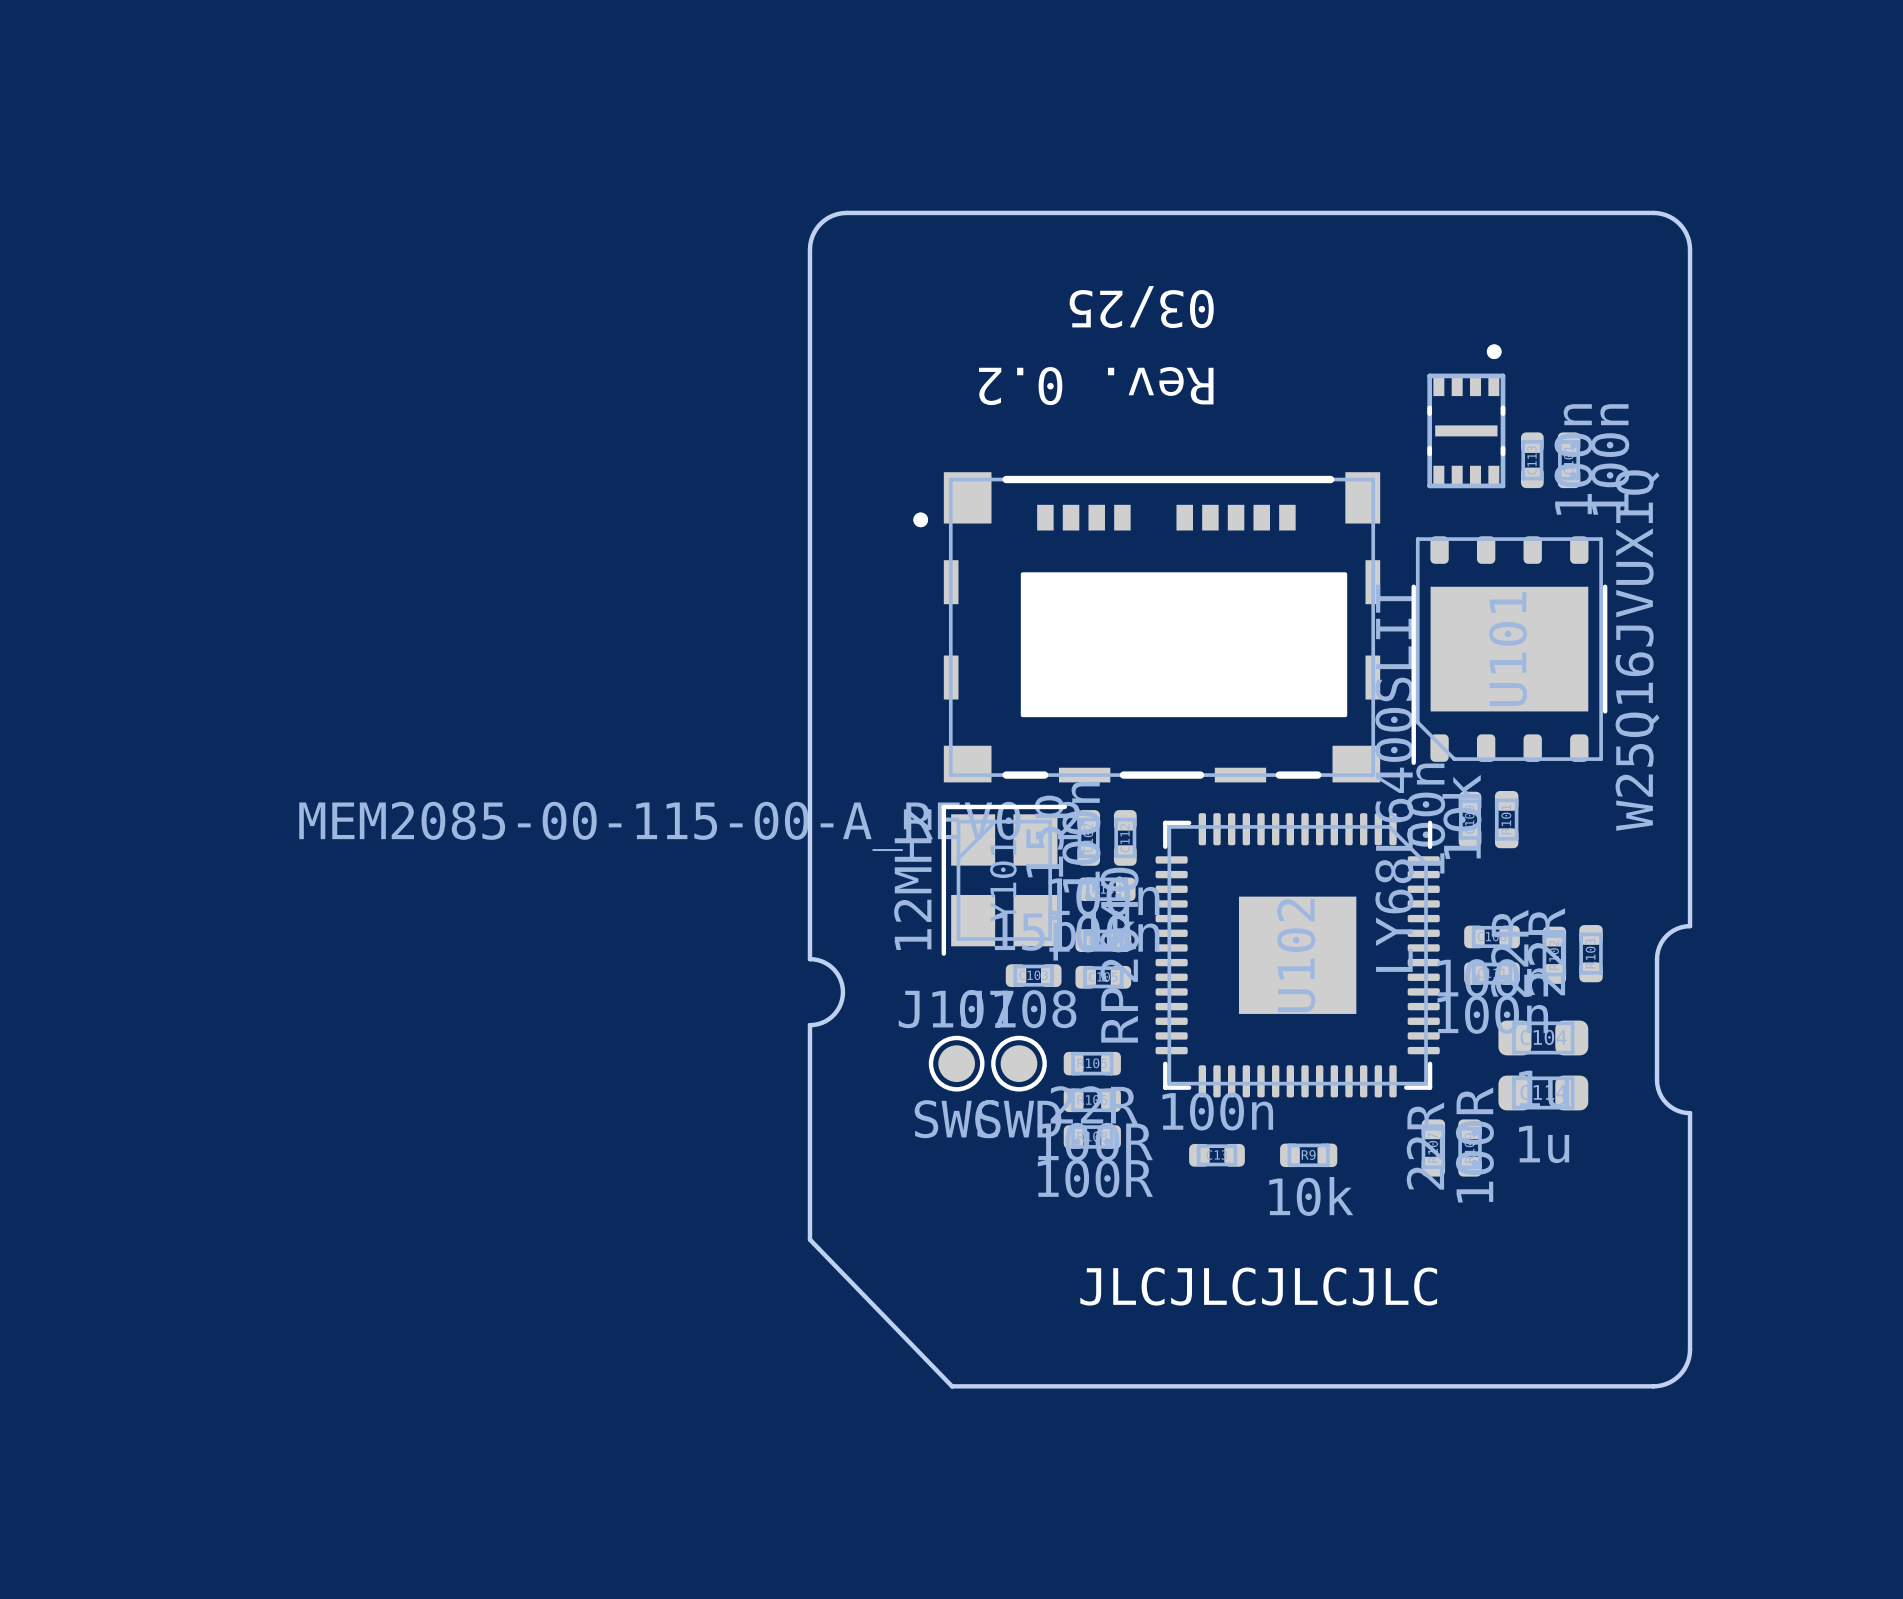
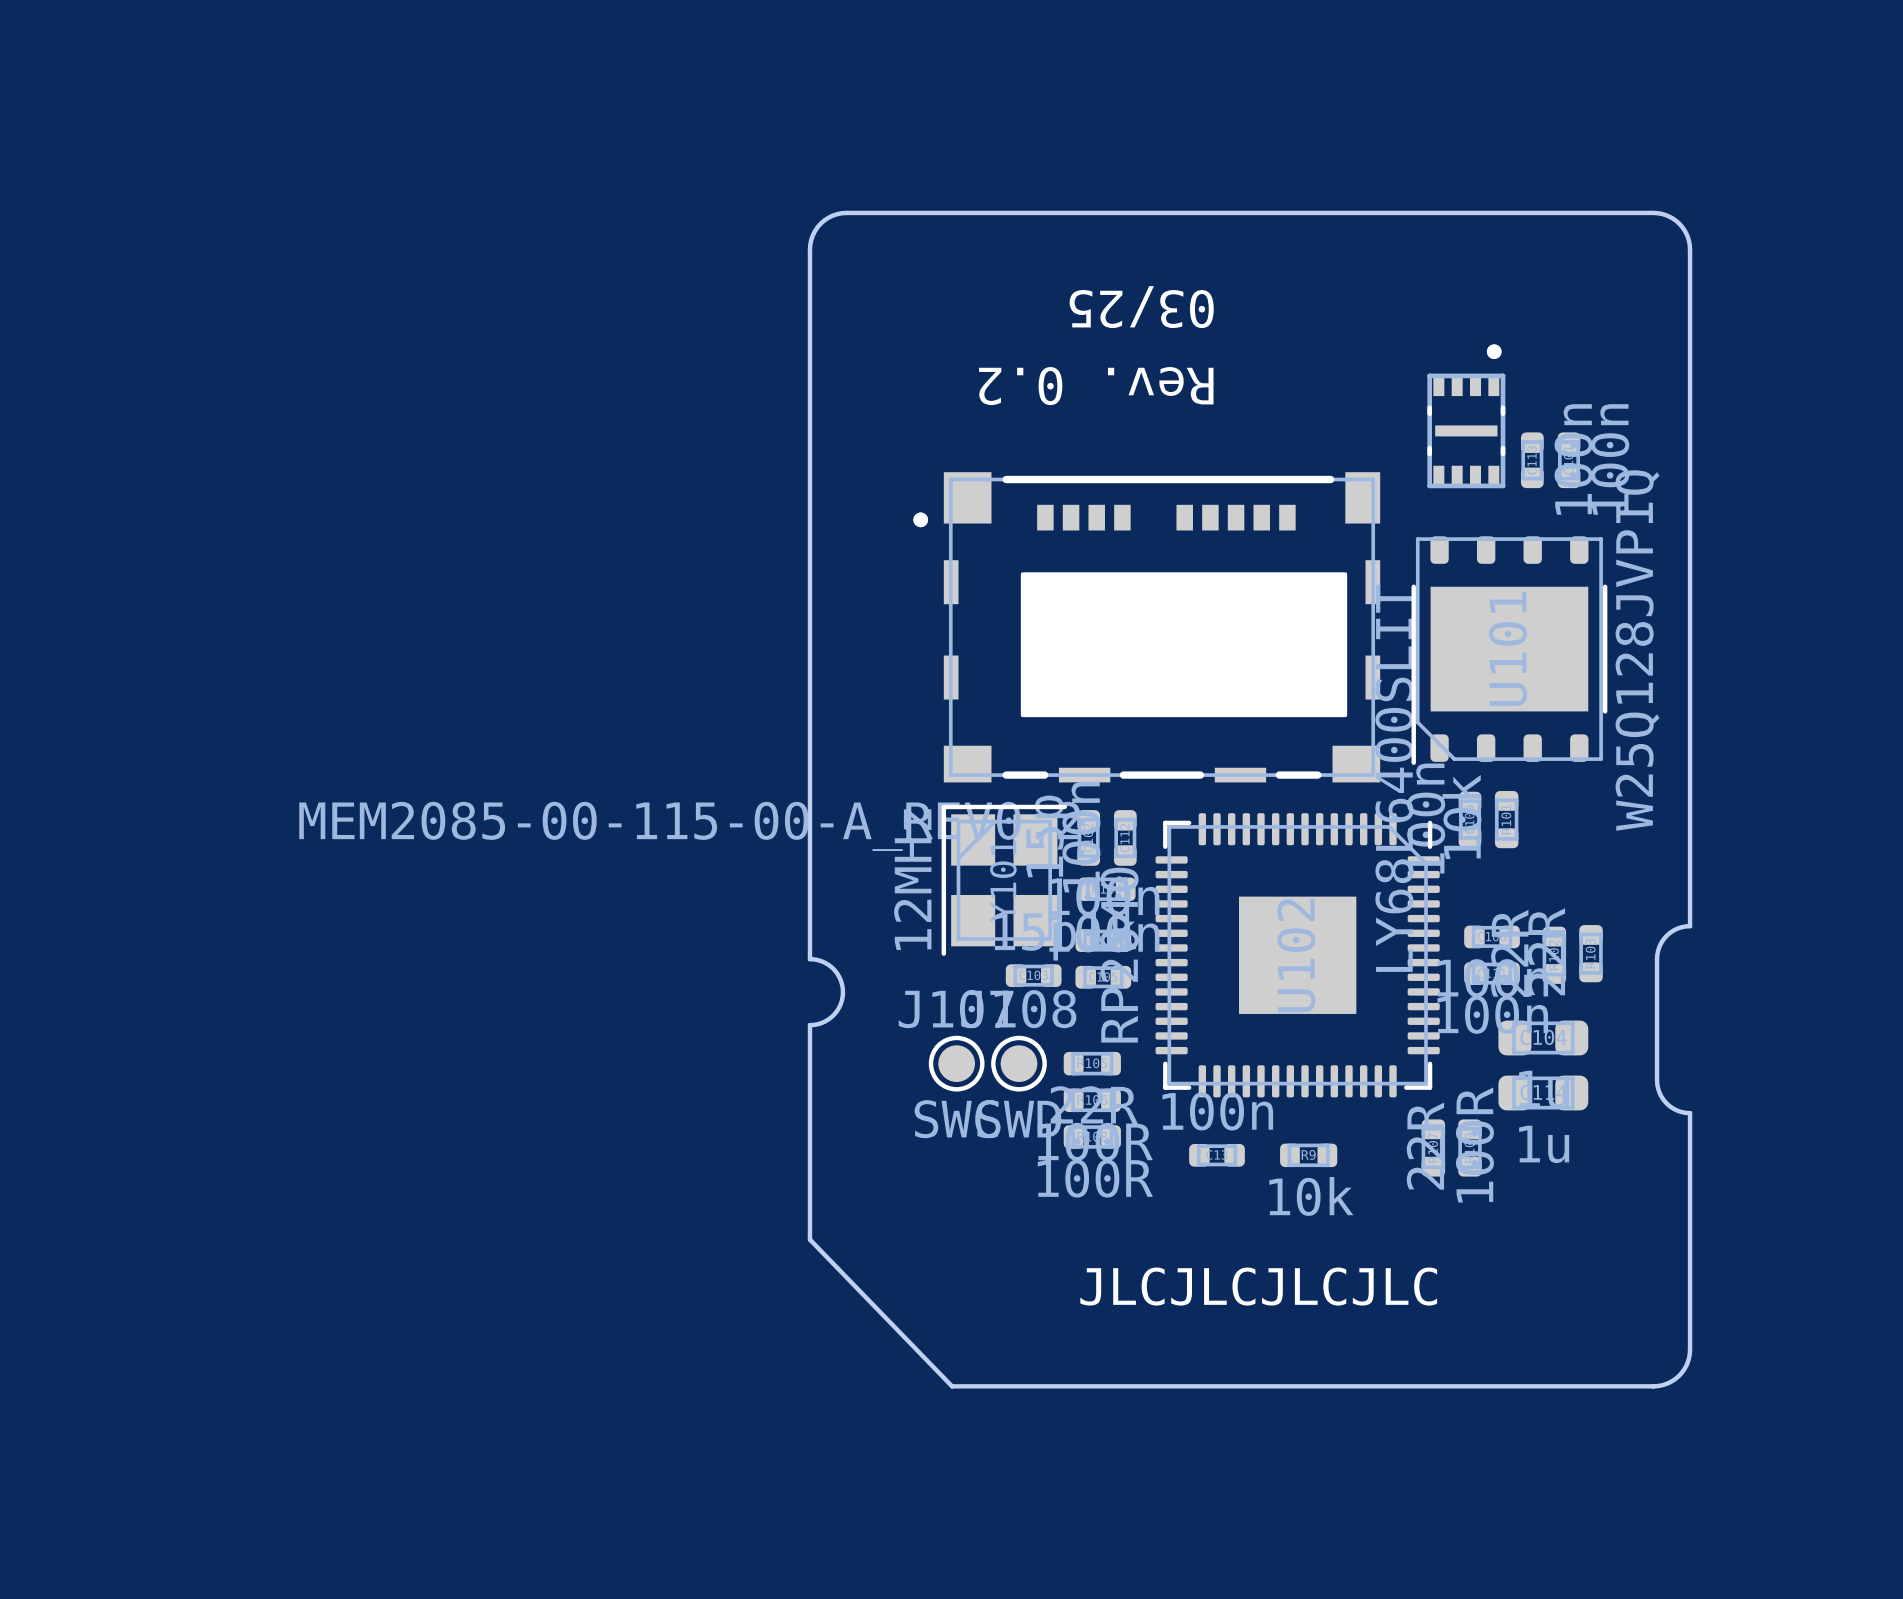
part value: W25Q16JVUXIQ (1637, 650) -> W25Q128JVPIQ (1637, 650)

